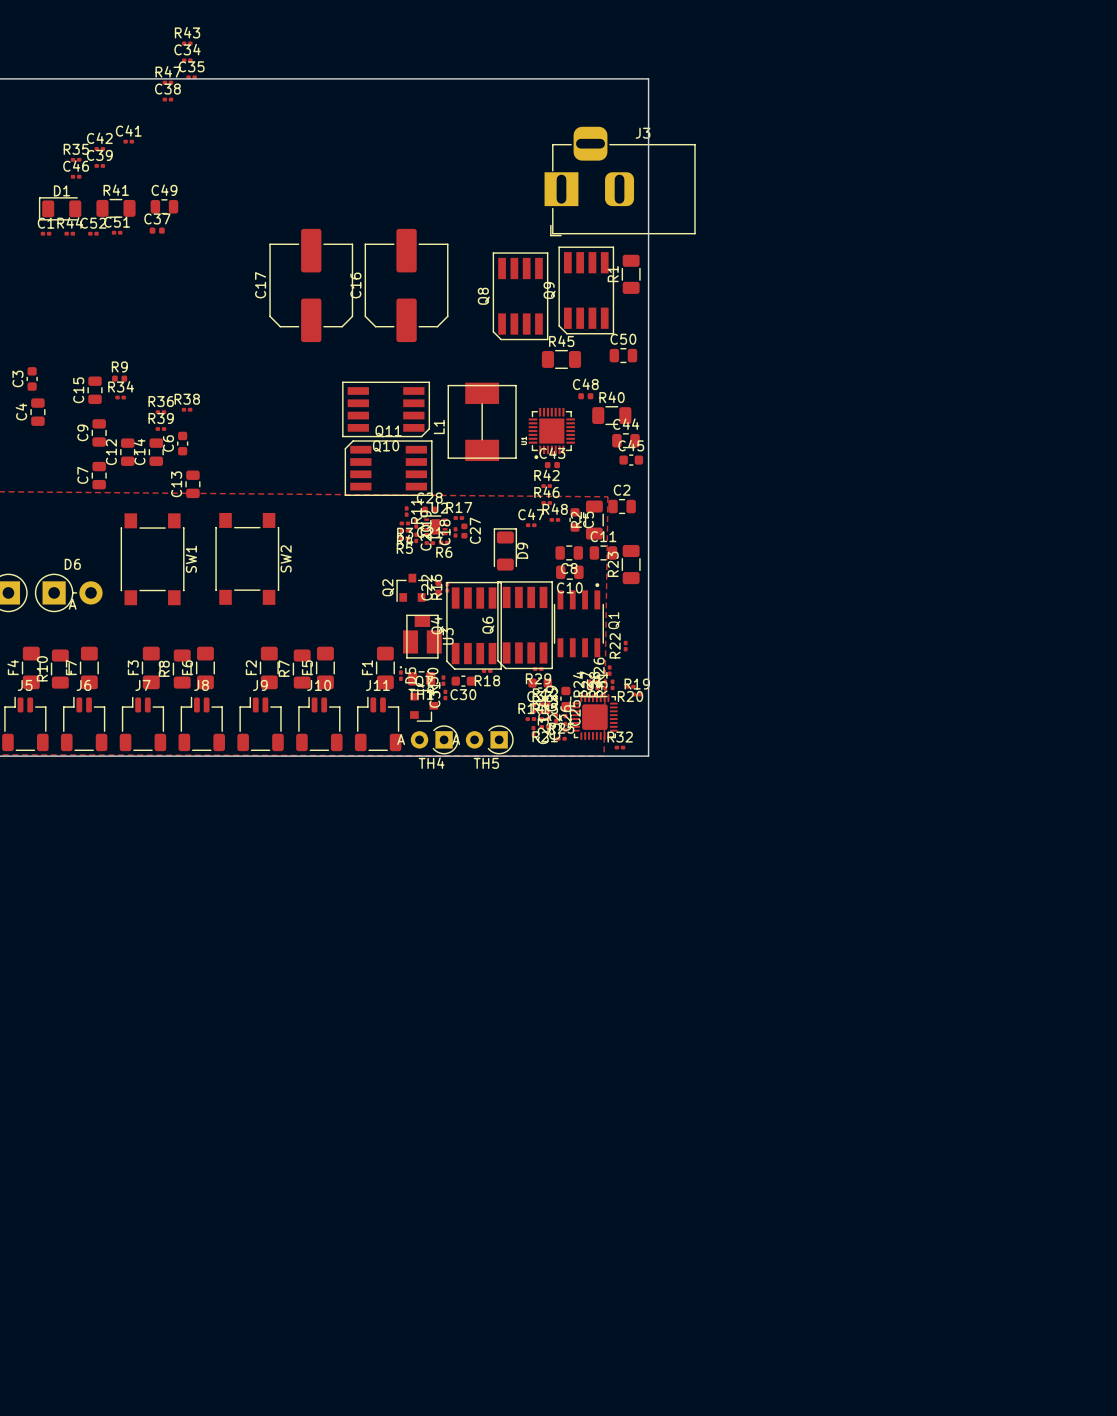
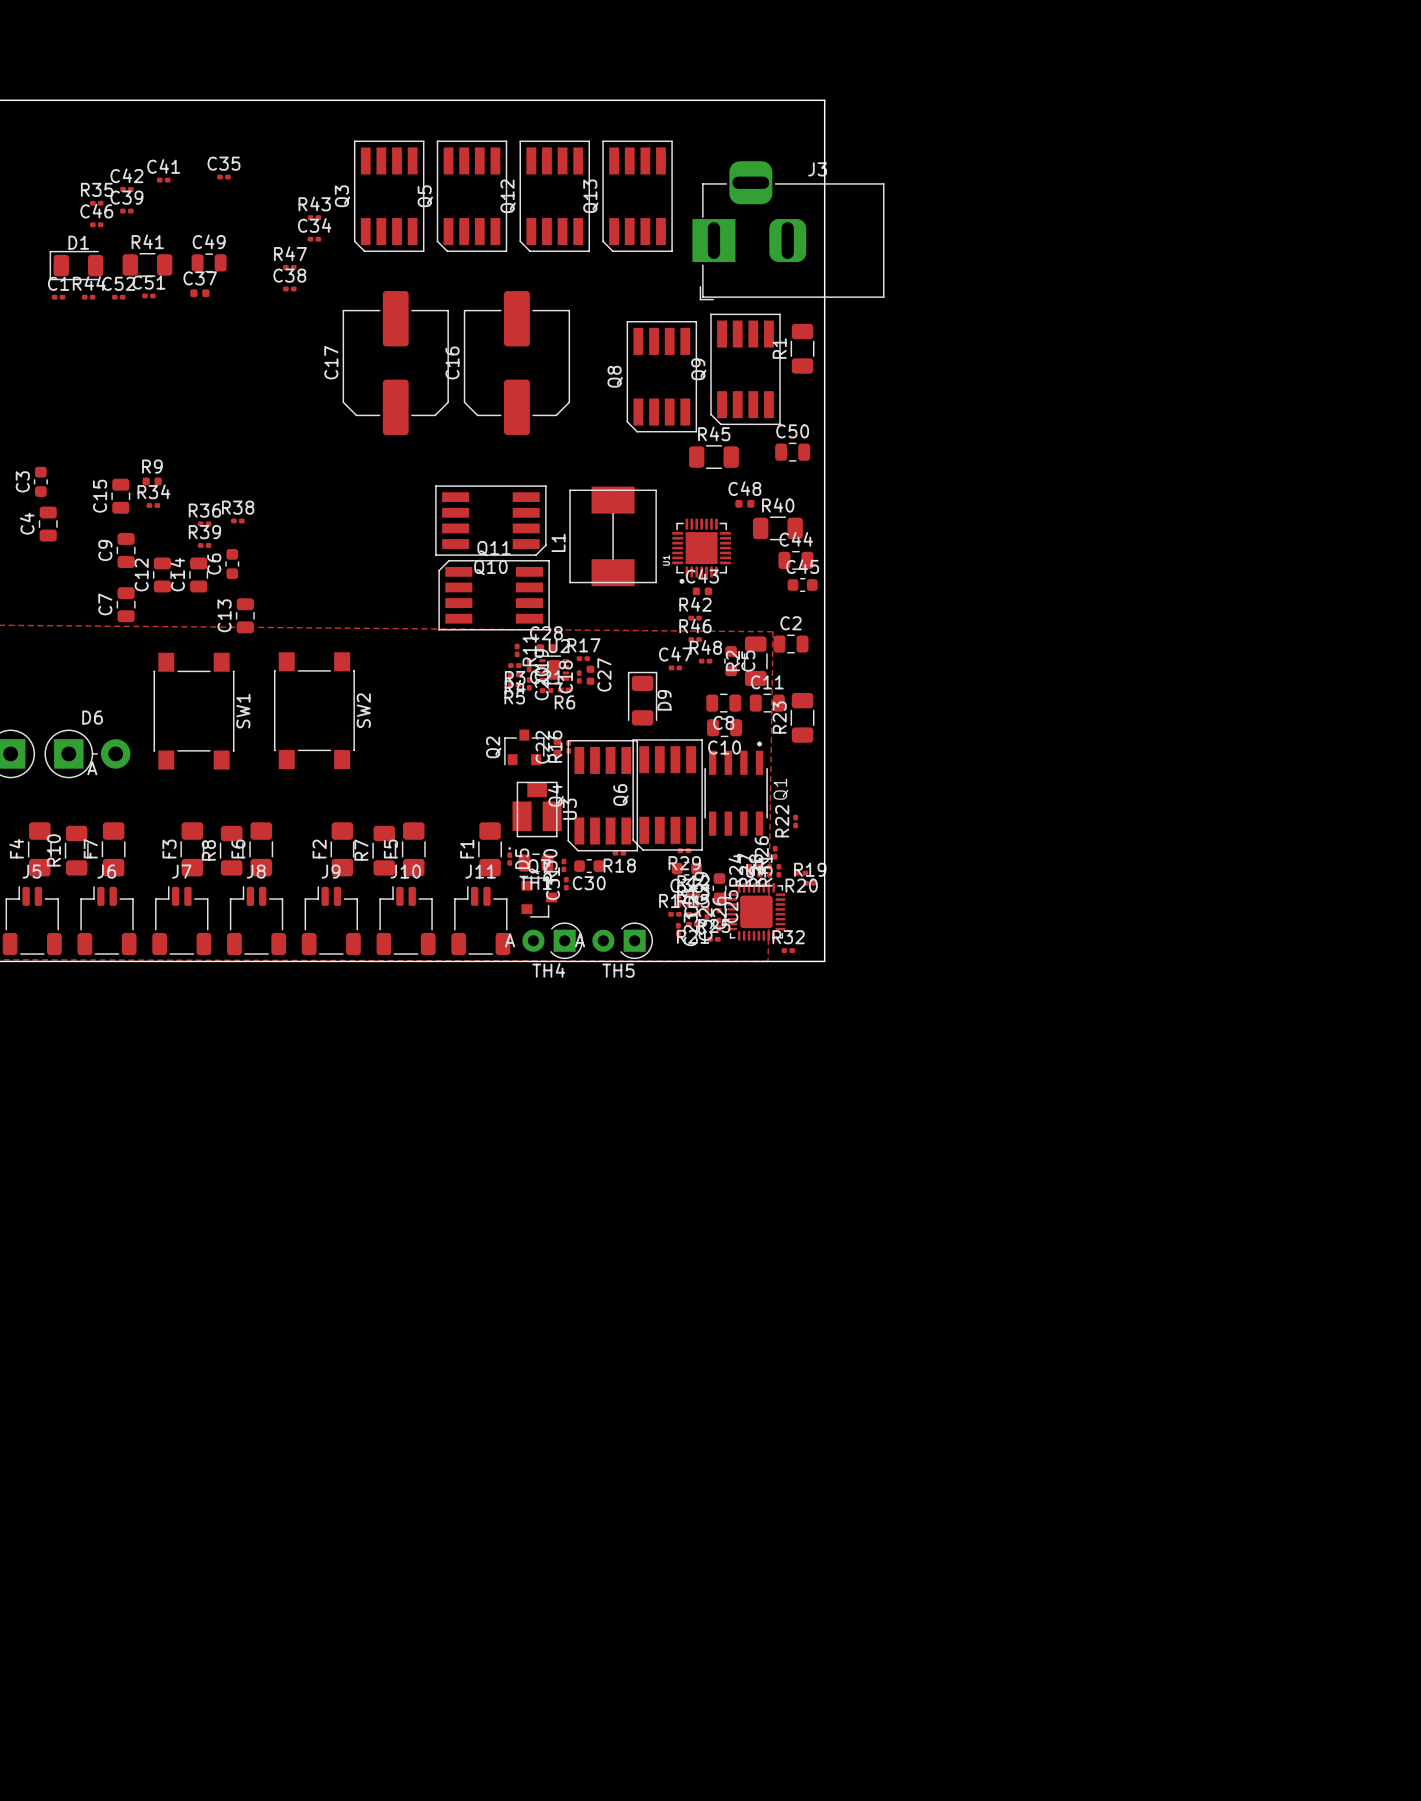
R43 position: (187, 43) -> (314, 217)
C34 position: (187, 60) -> (314, 239)
C35 position: (191, 77) -> (223, 177)
R47 position: (167, 82) -> (289, 267)
C38 position: (167, 99) -> (289, 288)
Q3: none -> (389, 196)
Q5: none -> (471, 196)
Q12: none -> (554, 196)
Q13: none -> (637, 196)

